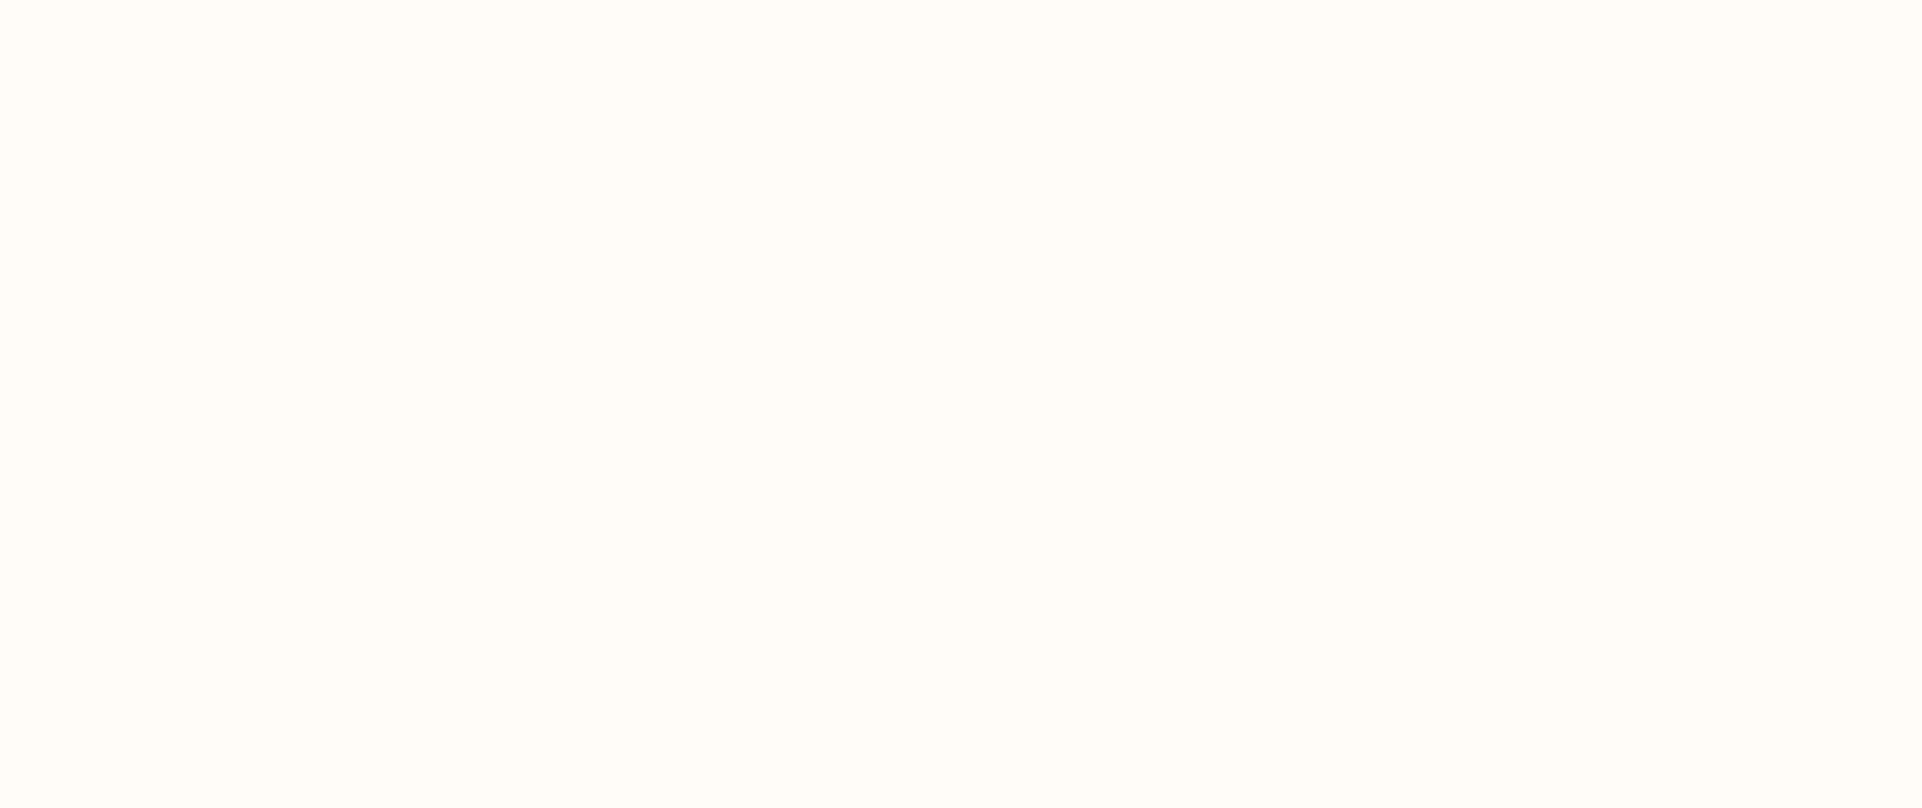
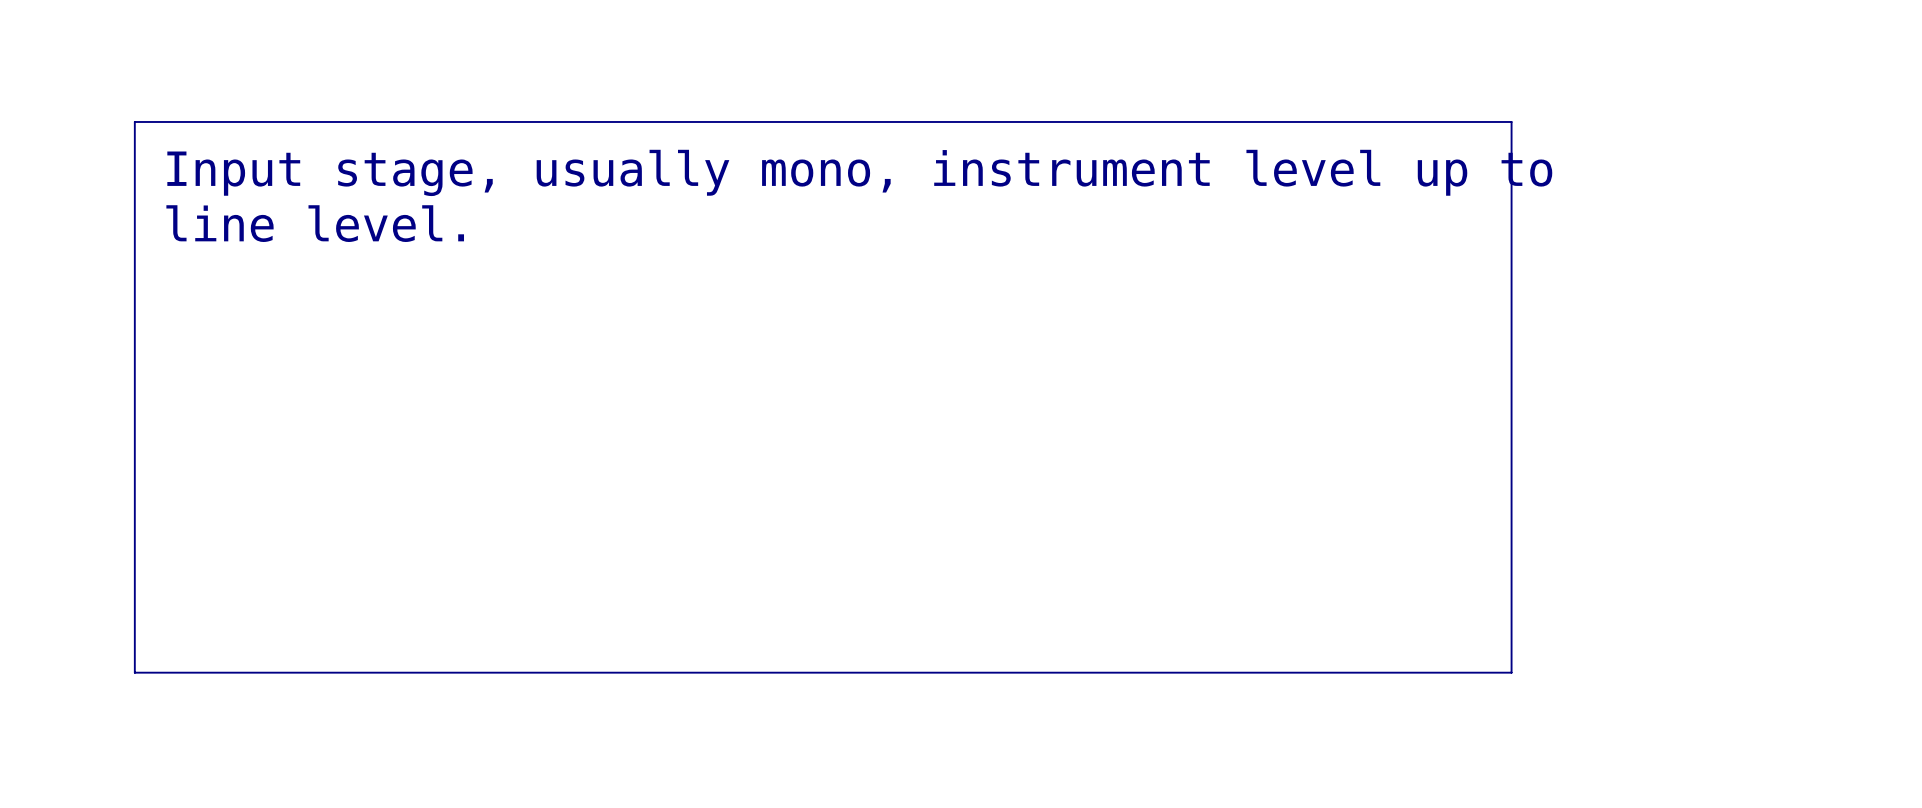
line: none -> (134, 121) (1511, 121) (1511, 672) (134, 672) (134, 121)
text: none -> Input stage, usually mono, instrument level up to (859, 172)
text: none -> line level. (315, 223)

